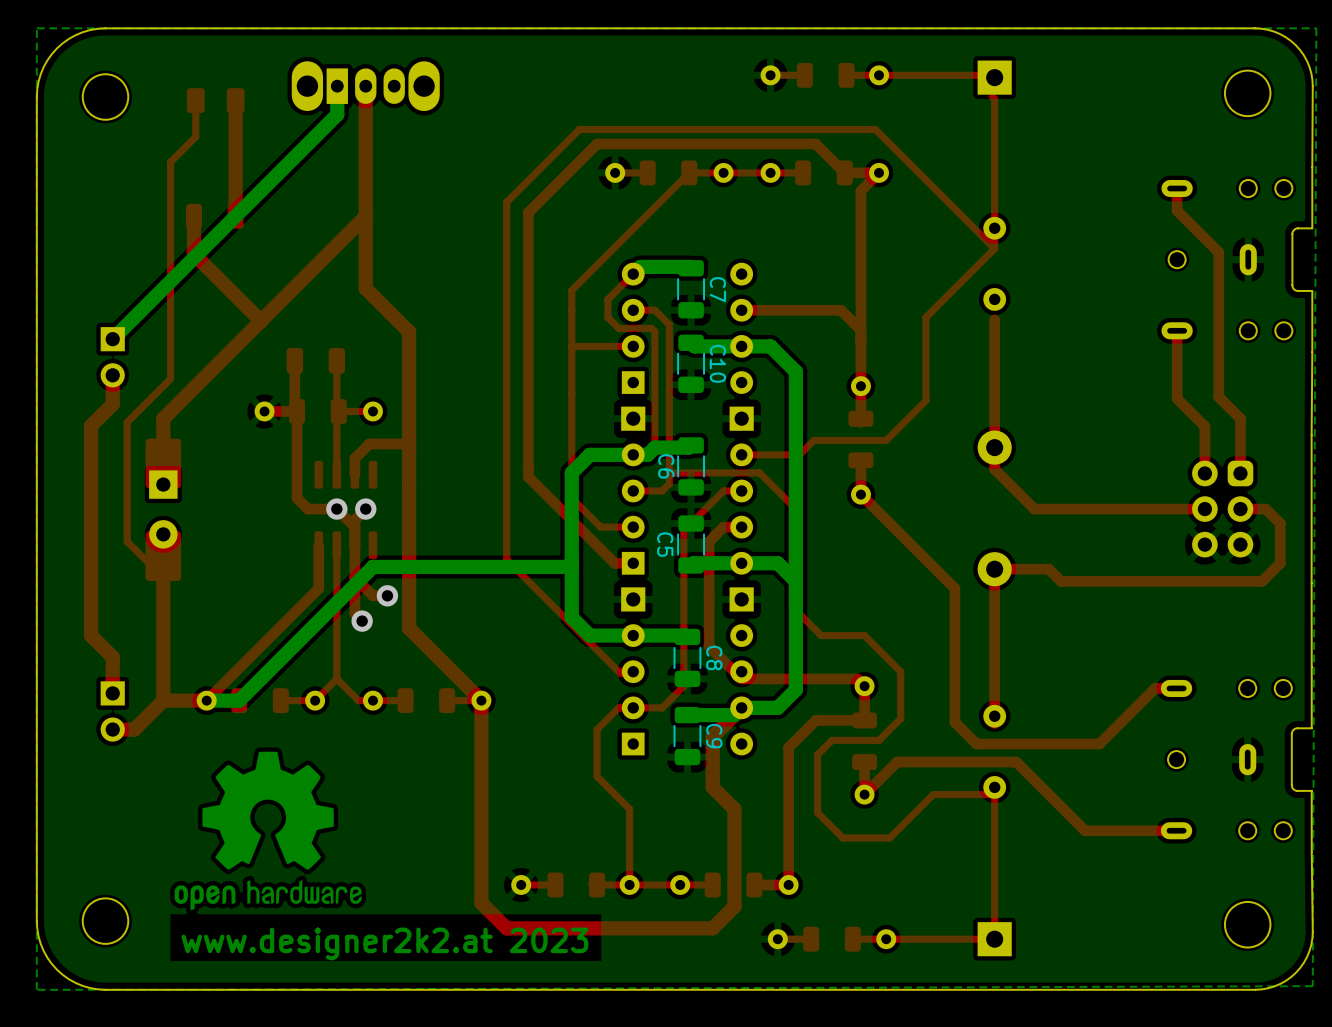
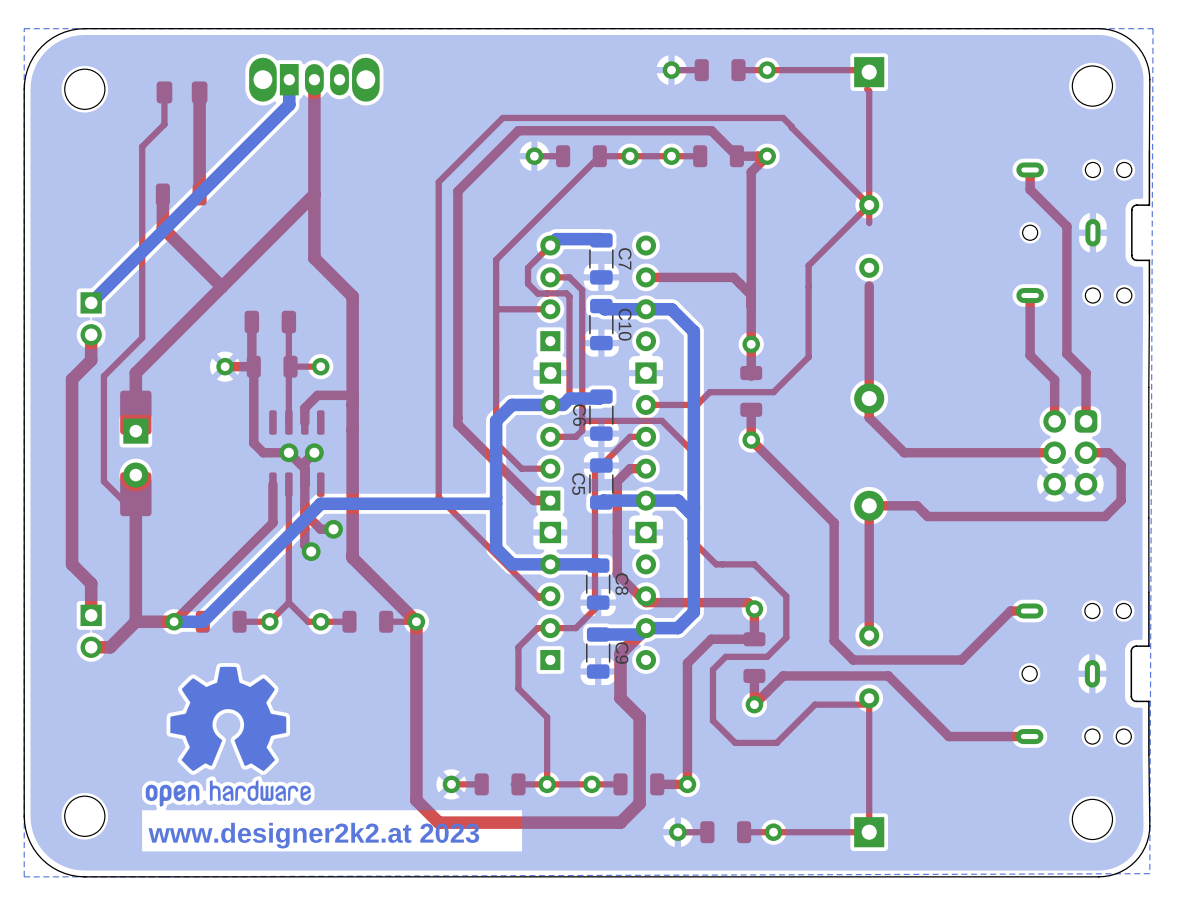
top track: (875, 129) (994, 248) (926, 317) -> (764, 117) (783, 117) (869, 205) (808, 265) (808, 283)

